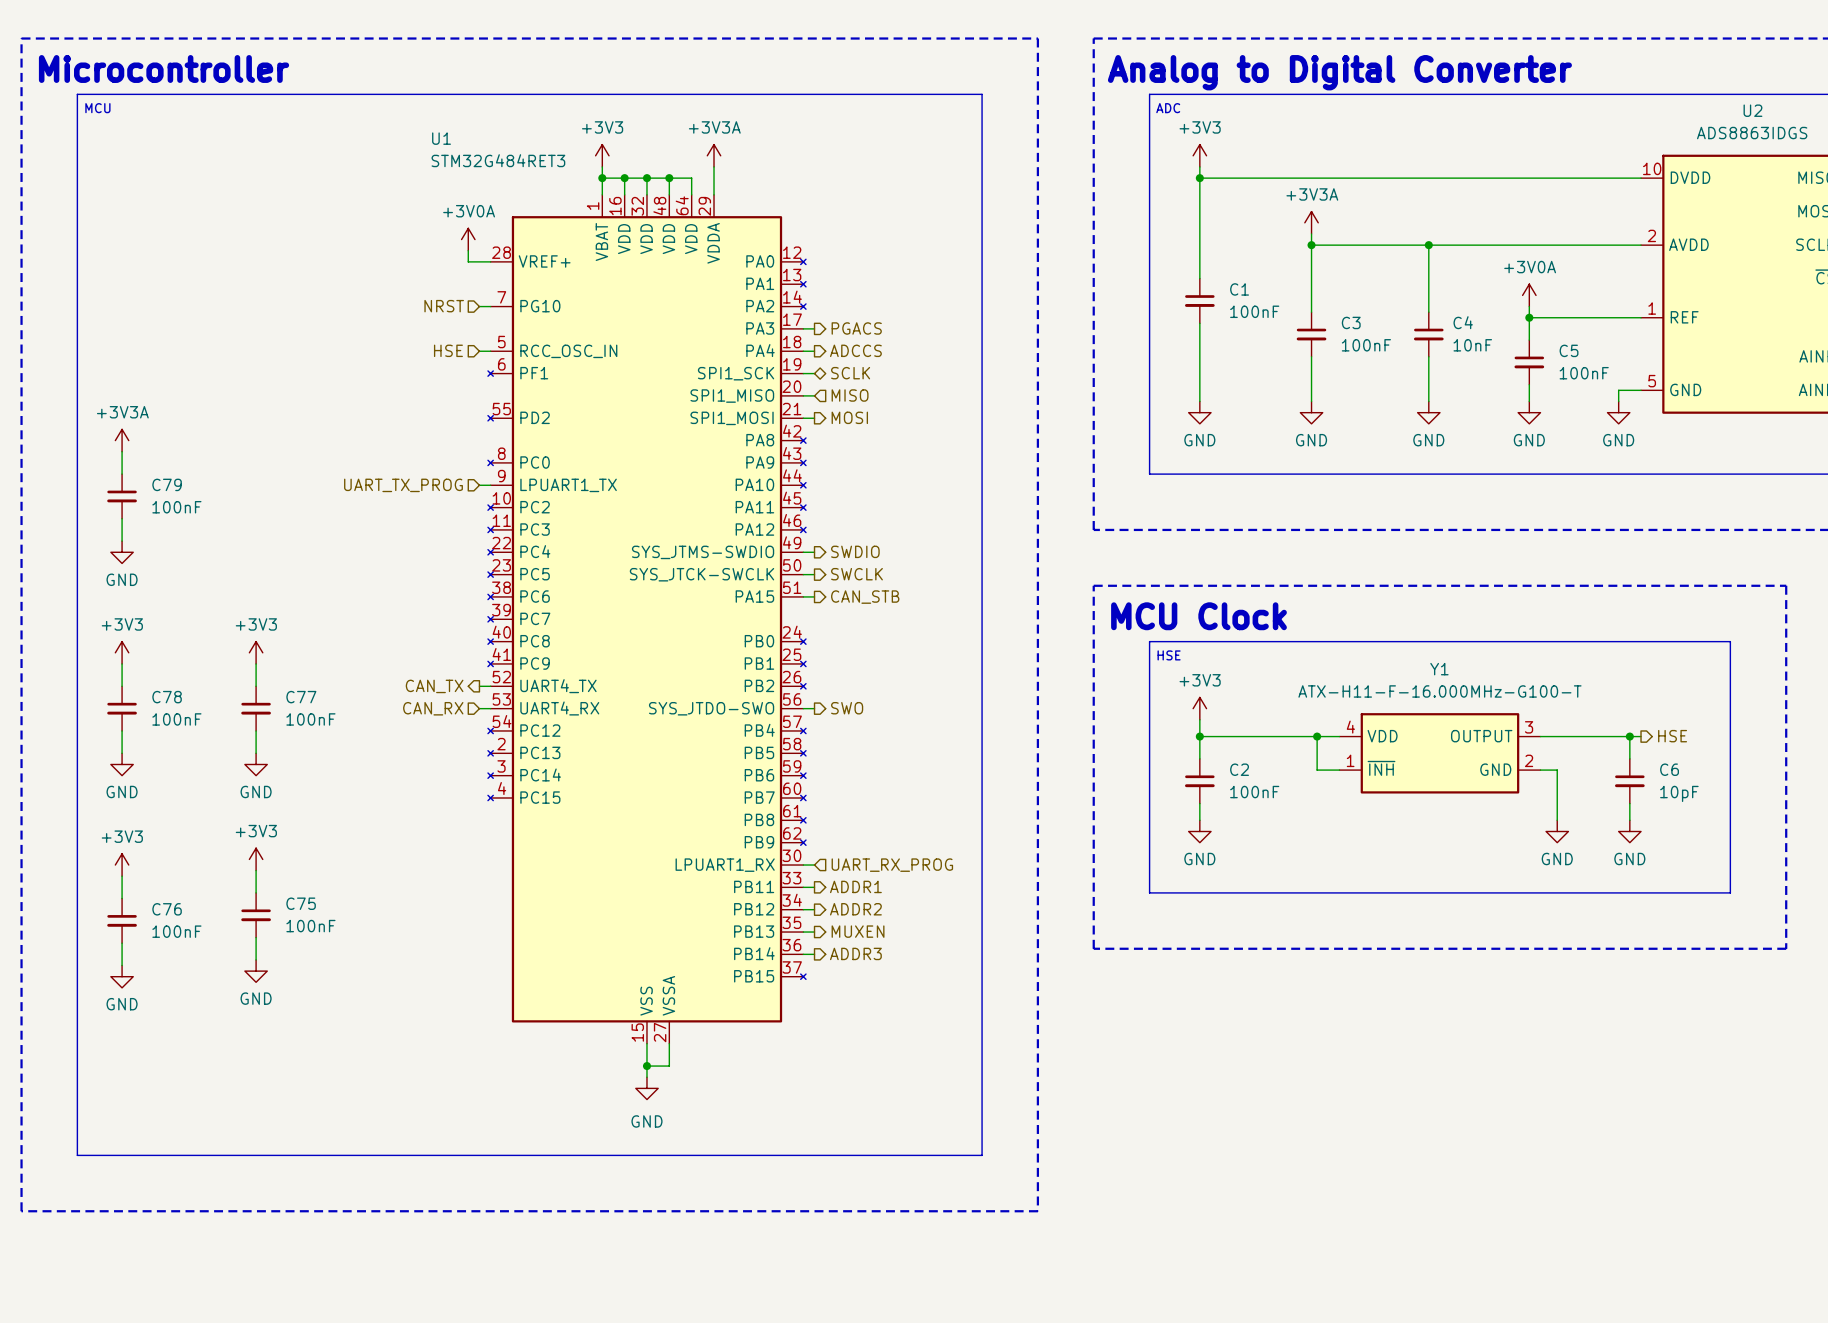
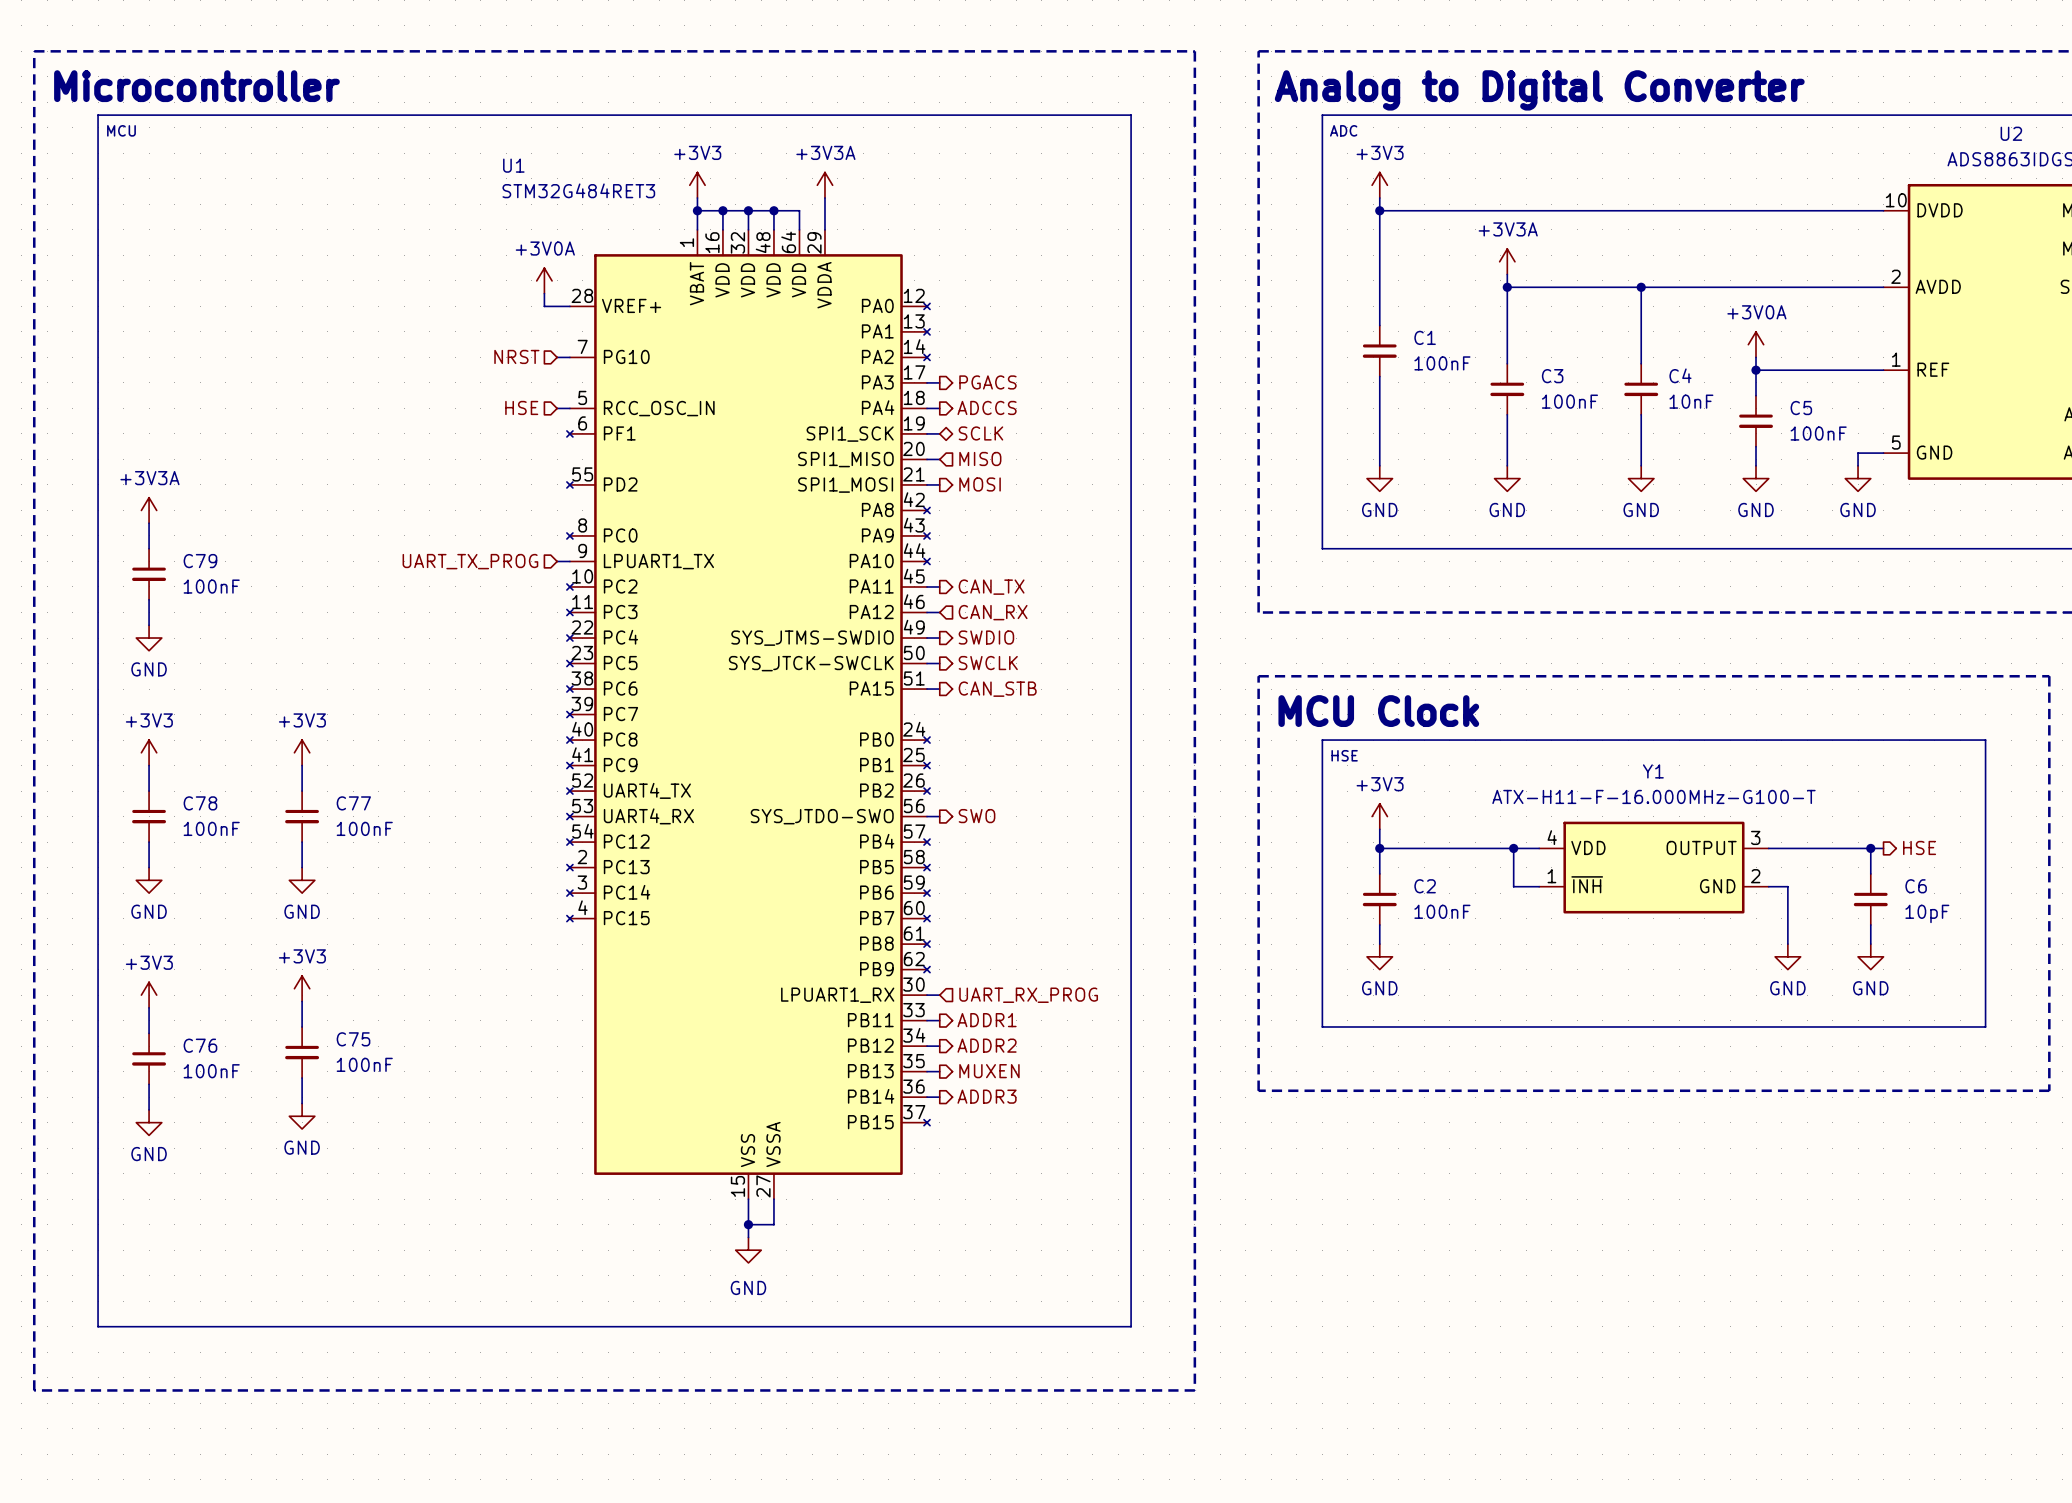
U1 symbol: [487, 194, 806, 1044] -> [566, 229, 931, 1200]
wire: none -> (927, 586) (939, 586)
hierarchical label: none -> CAN_TX (991, 587)
wire: none -> (927, 612) (939, 612)
hierarchical label: none -> CAN_RX (993, 612)
hierarchical label: CAN_TX (434, 686) -> none
wire: (479, 686) (490, 686) -> none
hierarchical label: CAN_RX (433, 708) -> none
wire: (479, 708) (490, 708) -> none

